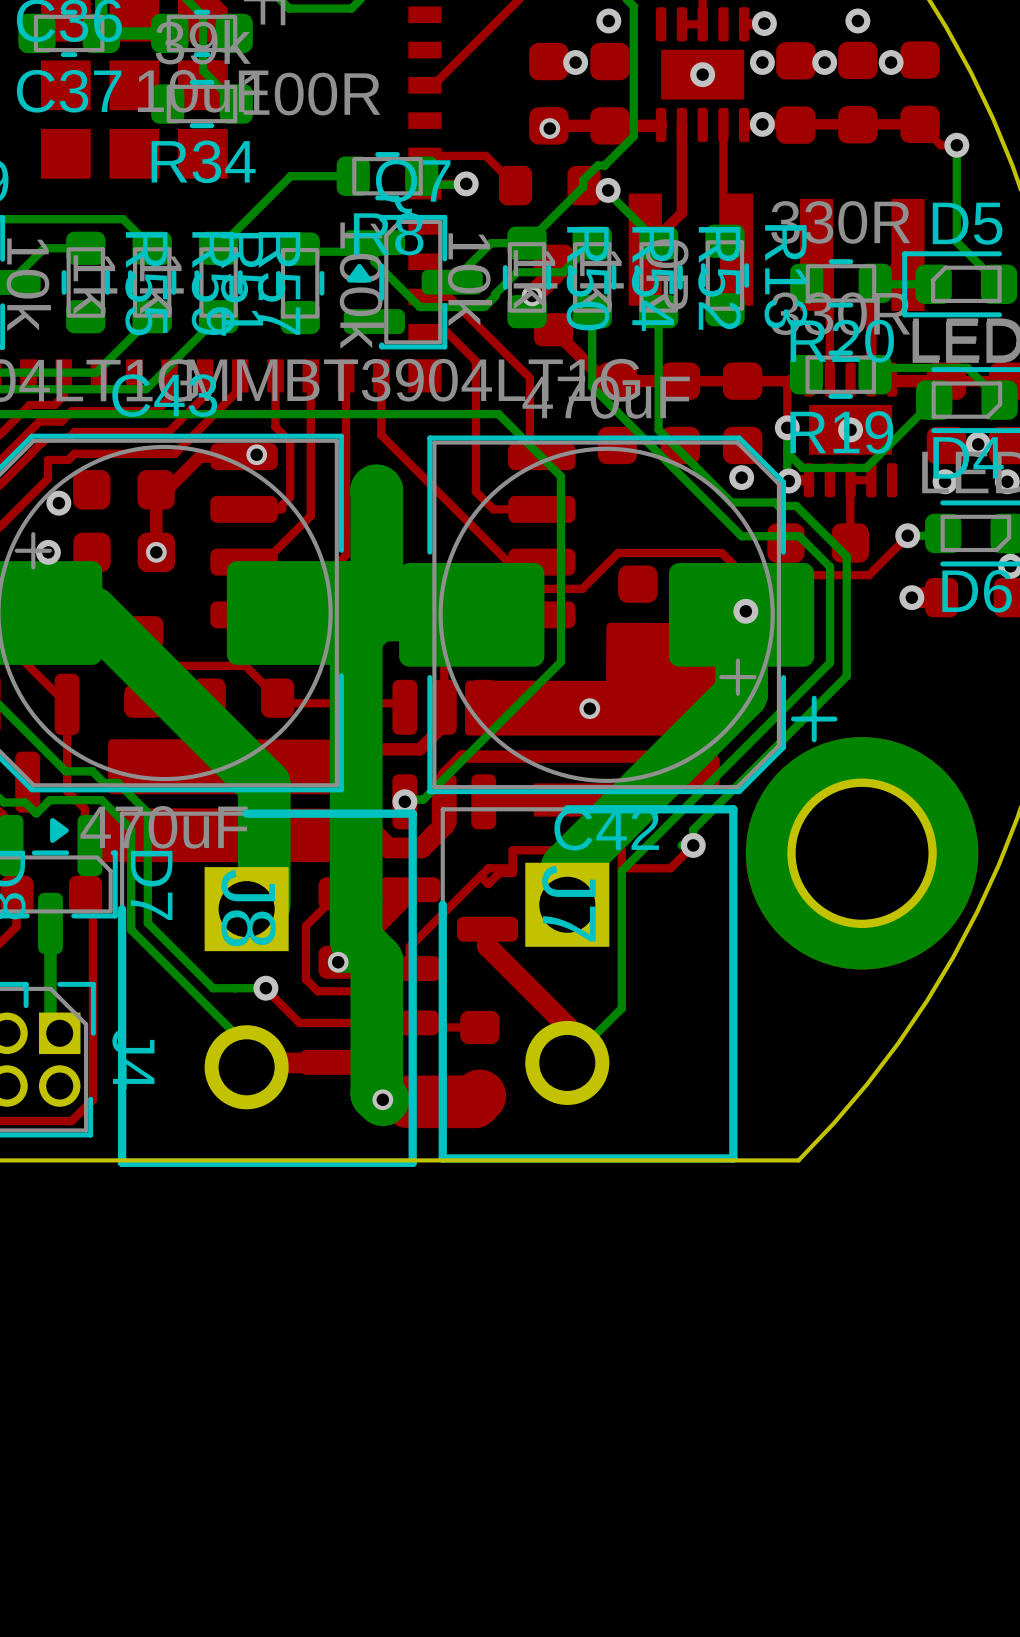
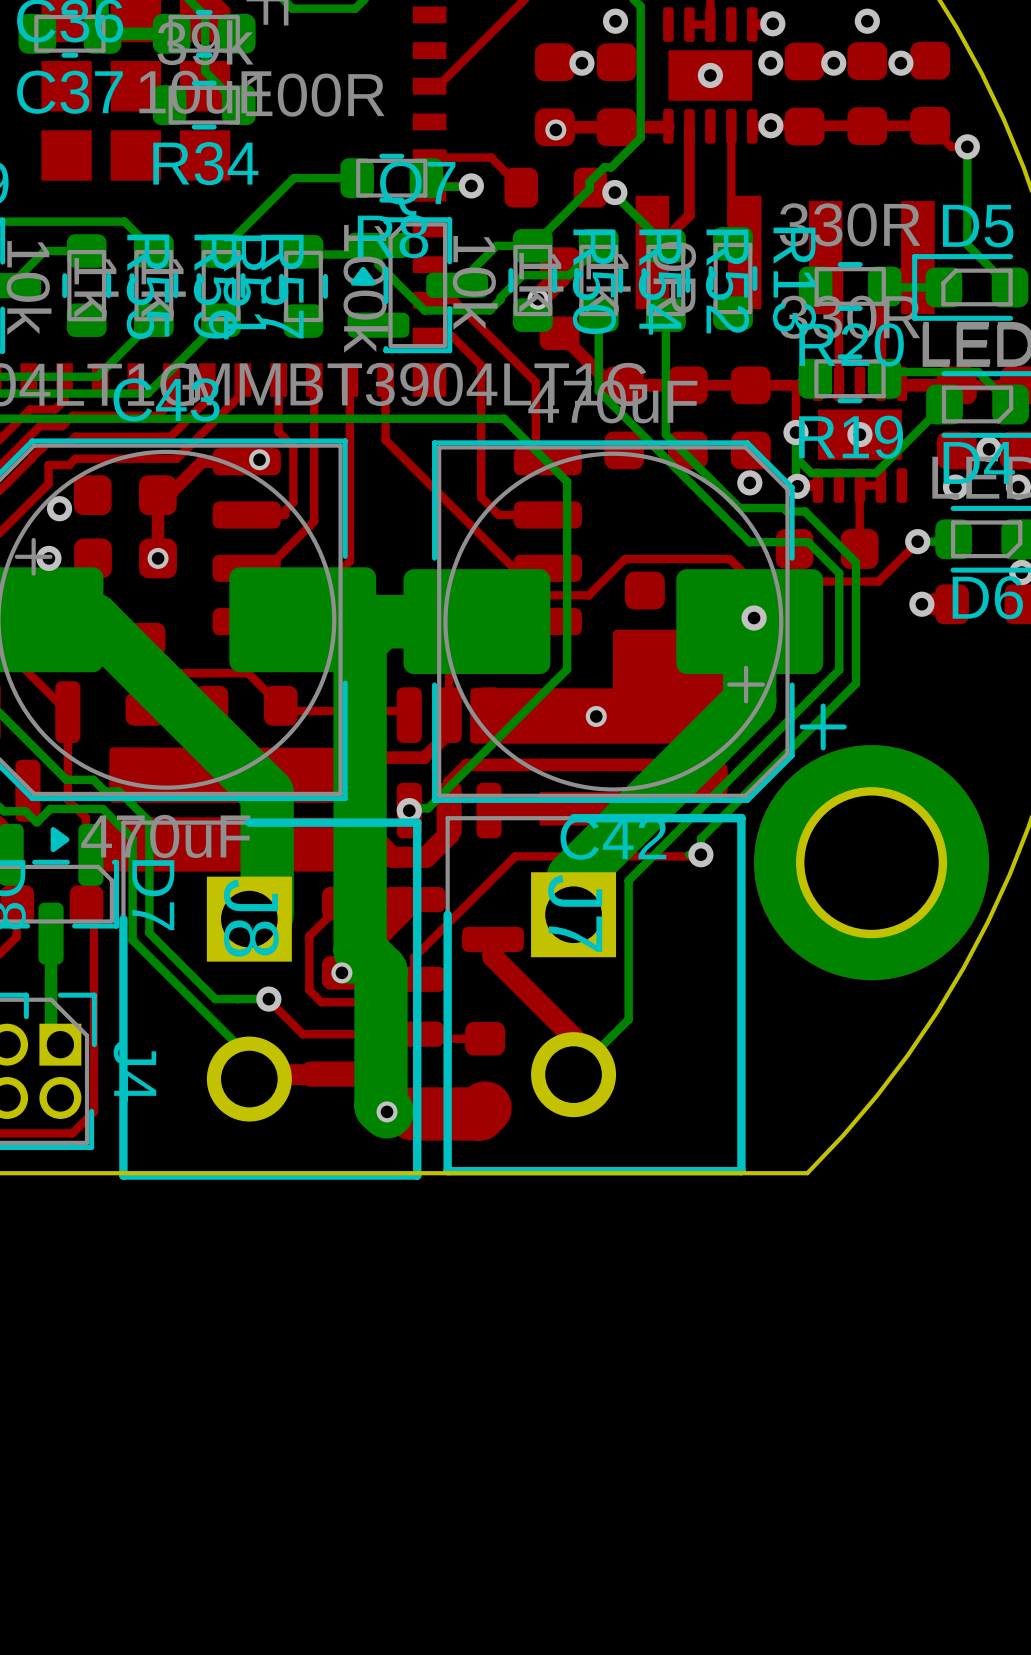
bottom track: (376, 491) (376, 614) -> none
top track: (693, 845) (670, 868) (621, 868) (621, 850) (512, 850) (512, 872) (499, 872) (488, 884) (482, 878) -> none
top track: (512, 868) (488, 868) -> (699, 856) (515, 856) (493, 877)

